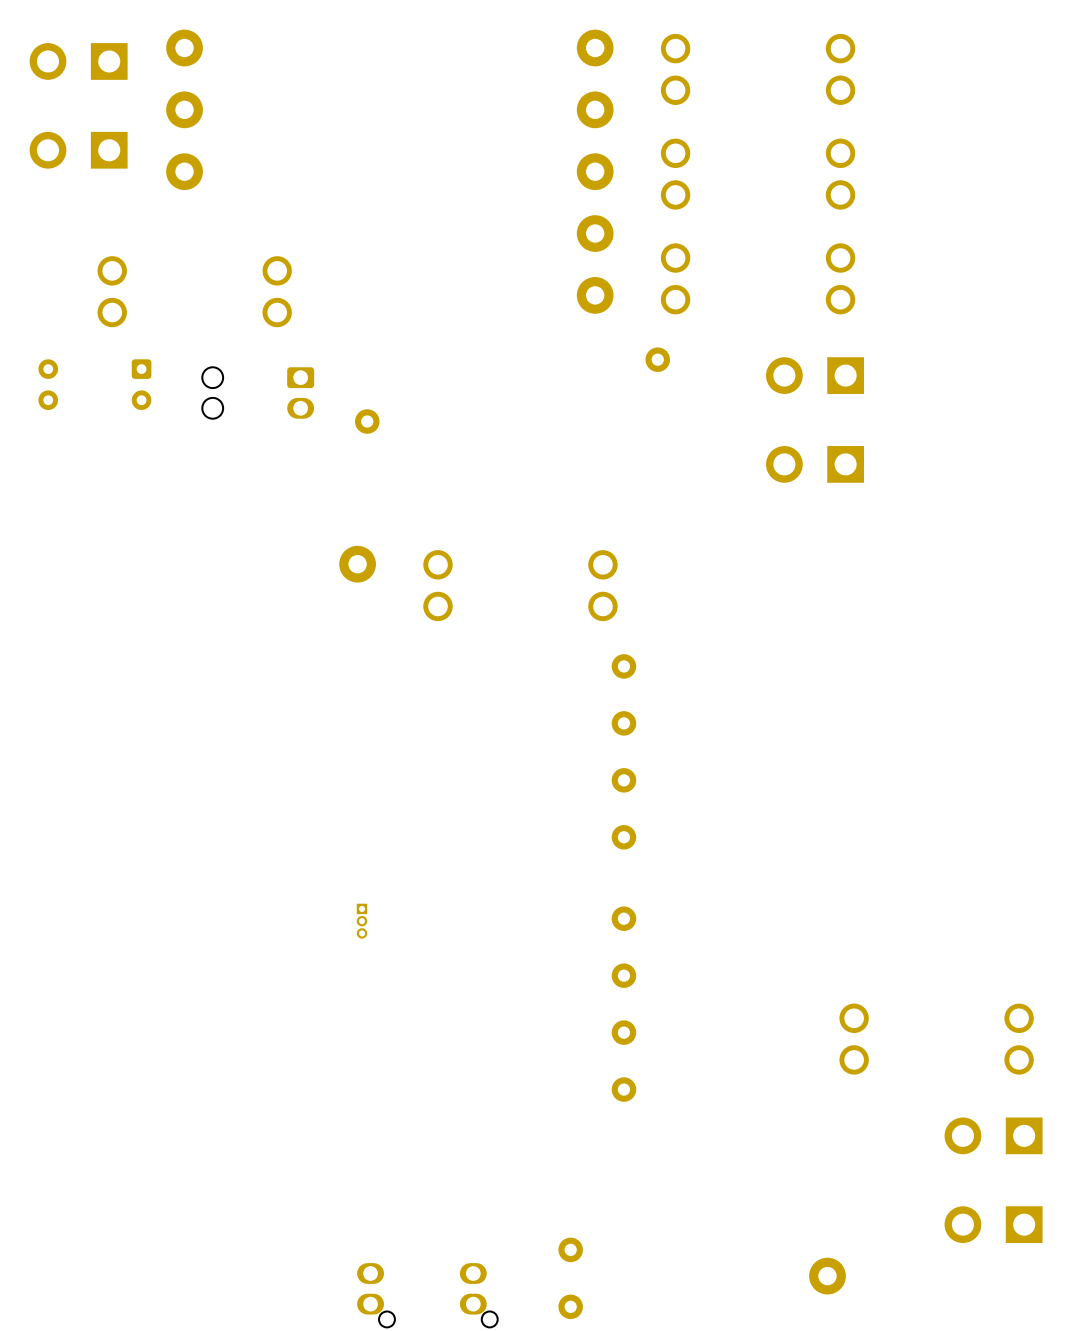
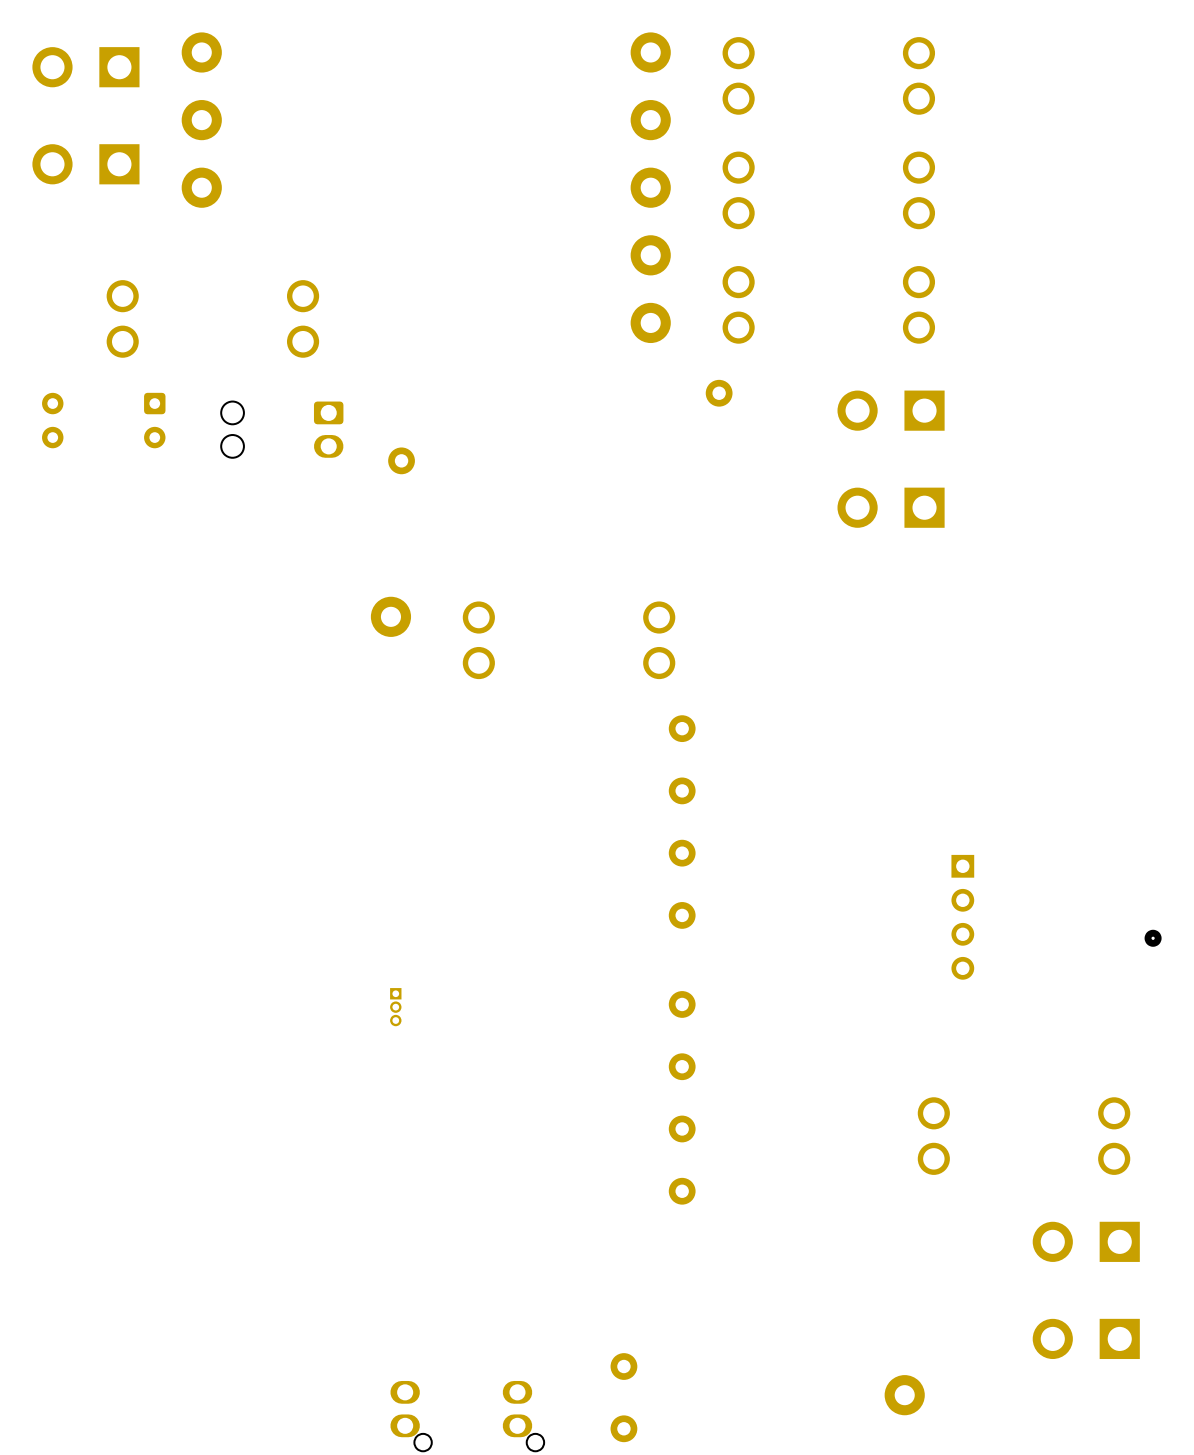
part: none -> (962, 917)
part: none -> (1153, 938)

